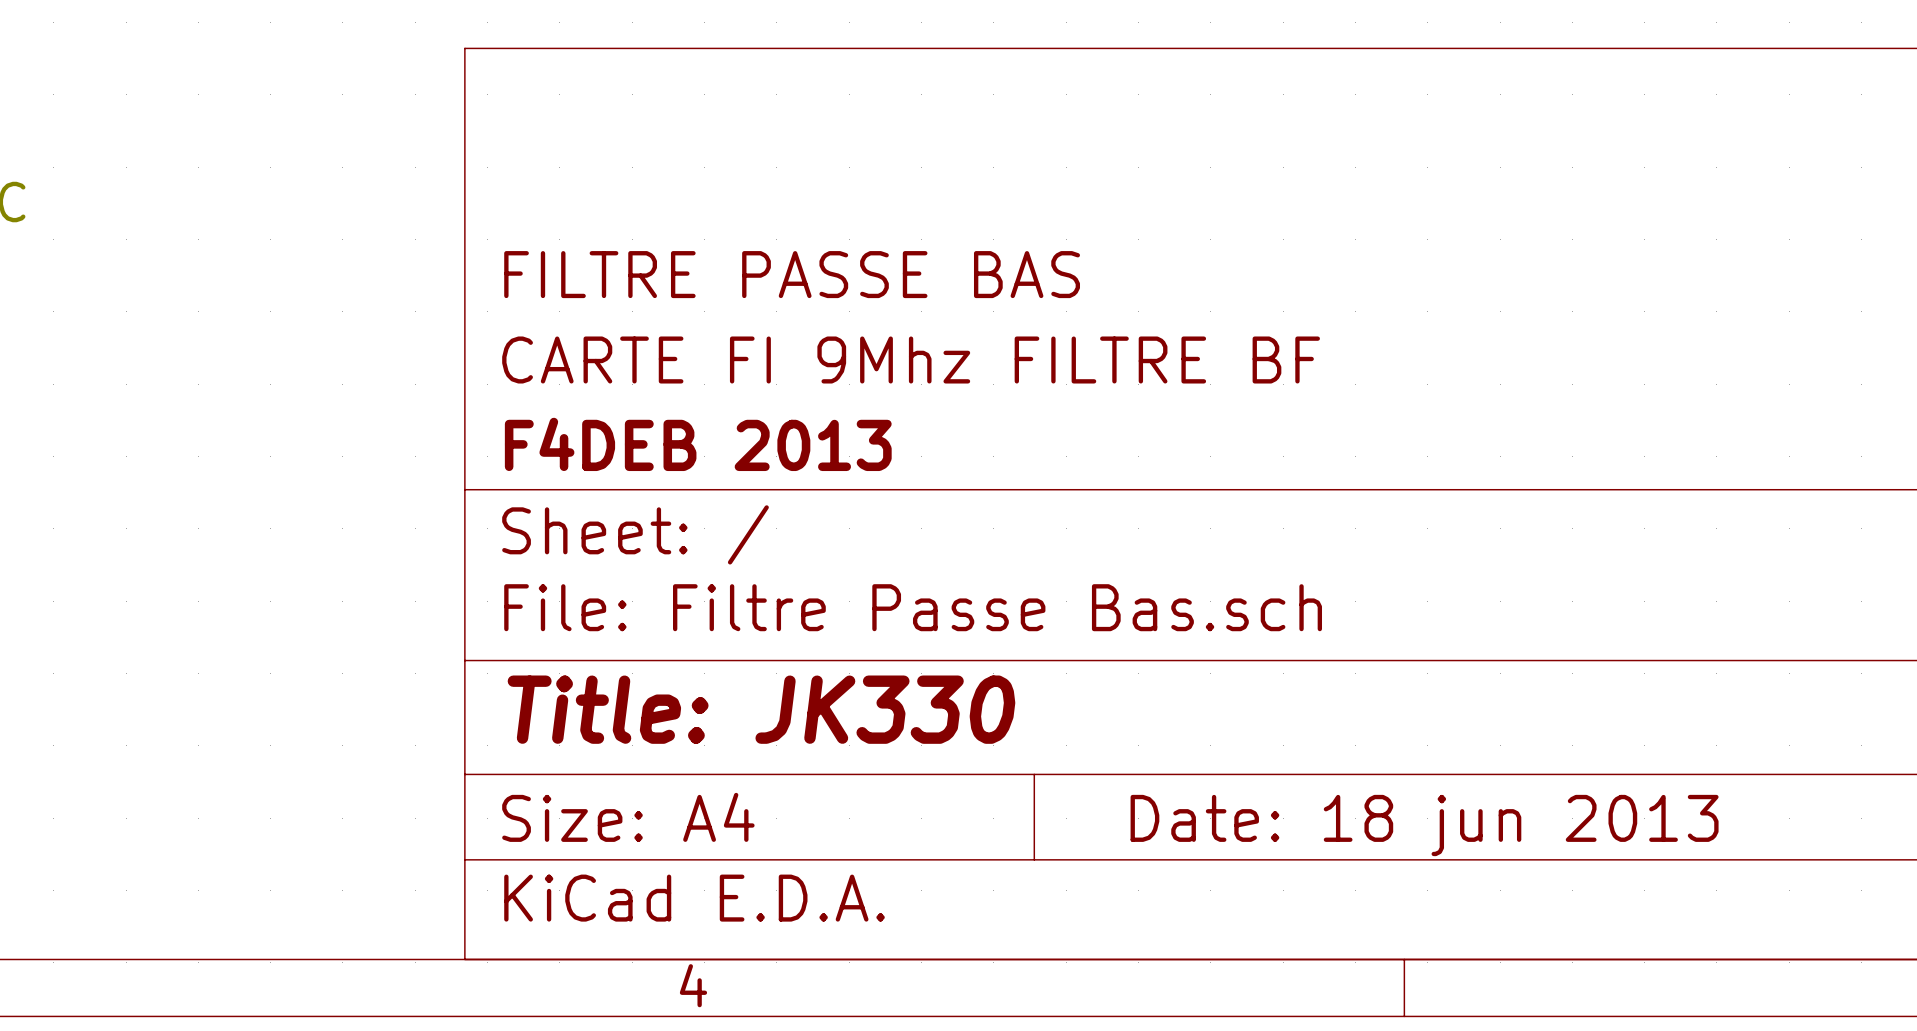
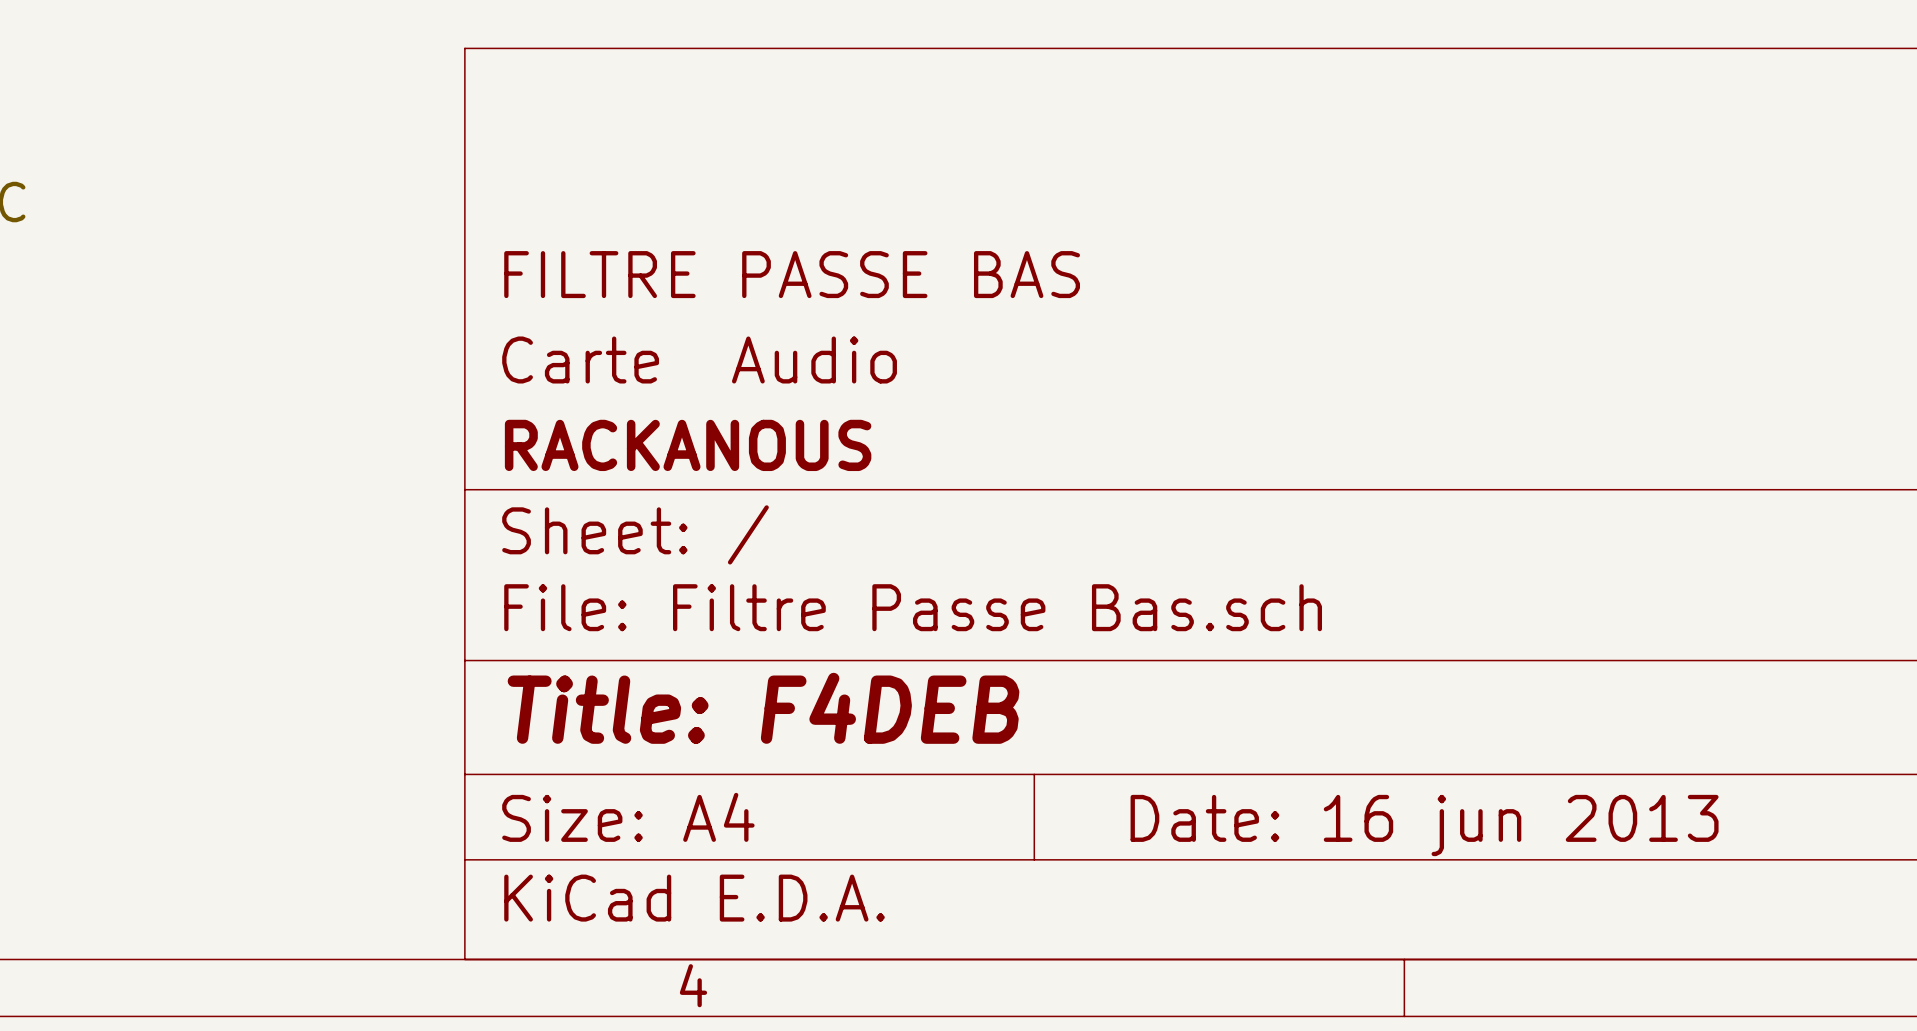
title block: CARTE FI 9Mhz FILTRE BF (911, 360) -> Carte Audio (699, 360)
title block: F4DEB 2013 (698, 444) -> RACKANOUS (688, 445)
title block: Title: JK330 (761, 709) -> Title: F4DEB (763, 708)
title block: Date: 18 jun 2013 (1424, 825) -> Date: 16 jun 2013 (1424, 825)

